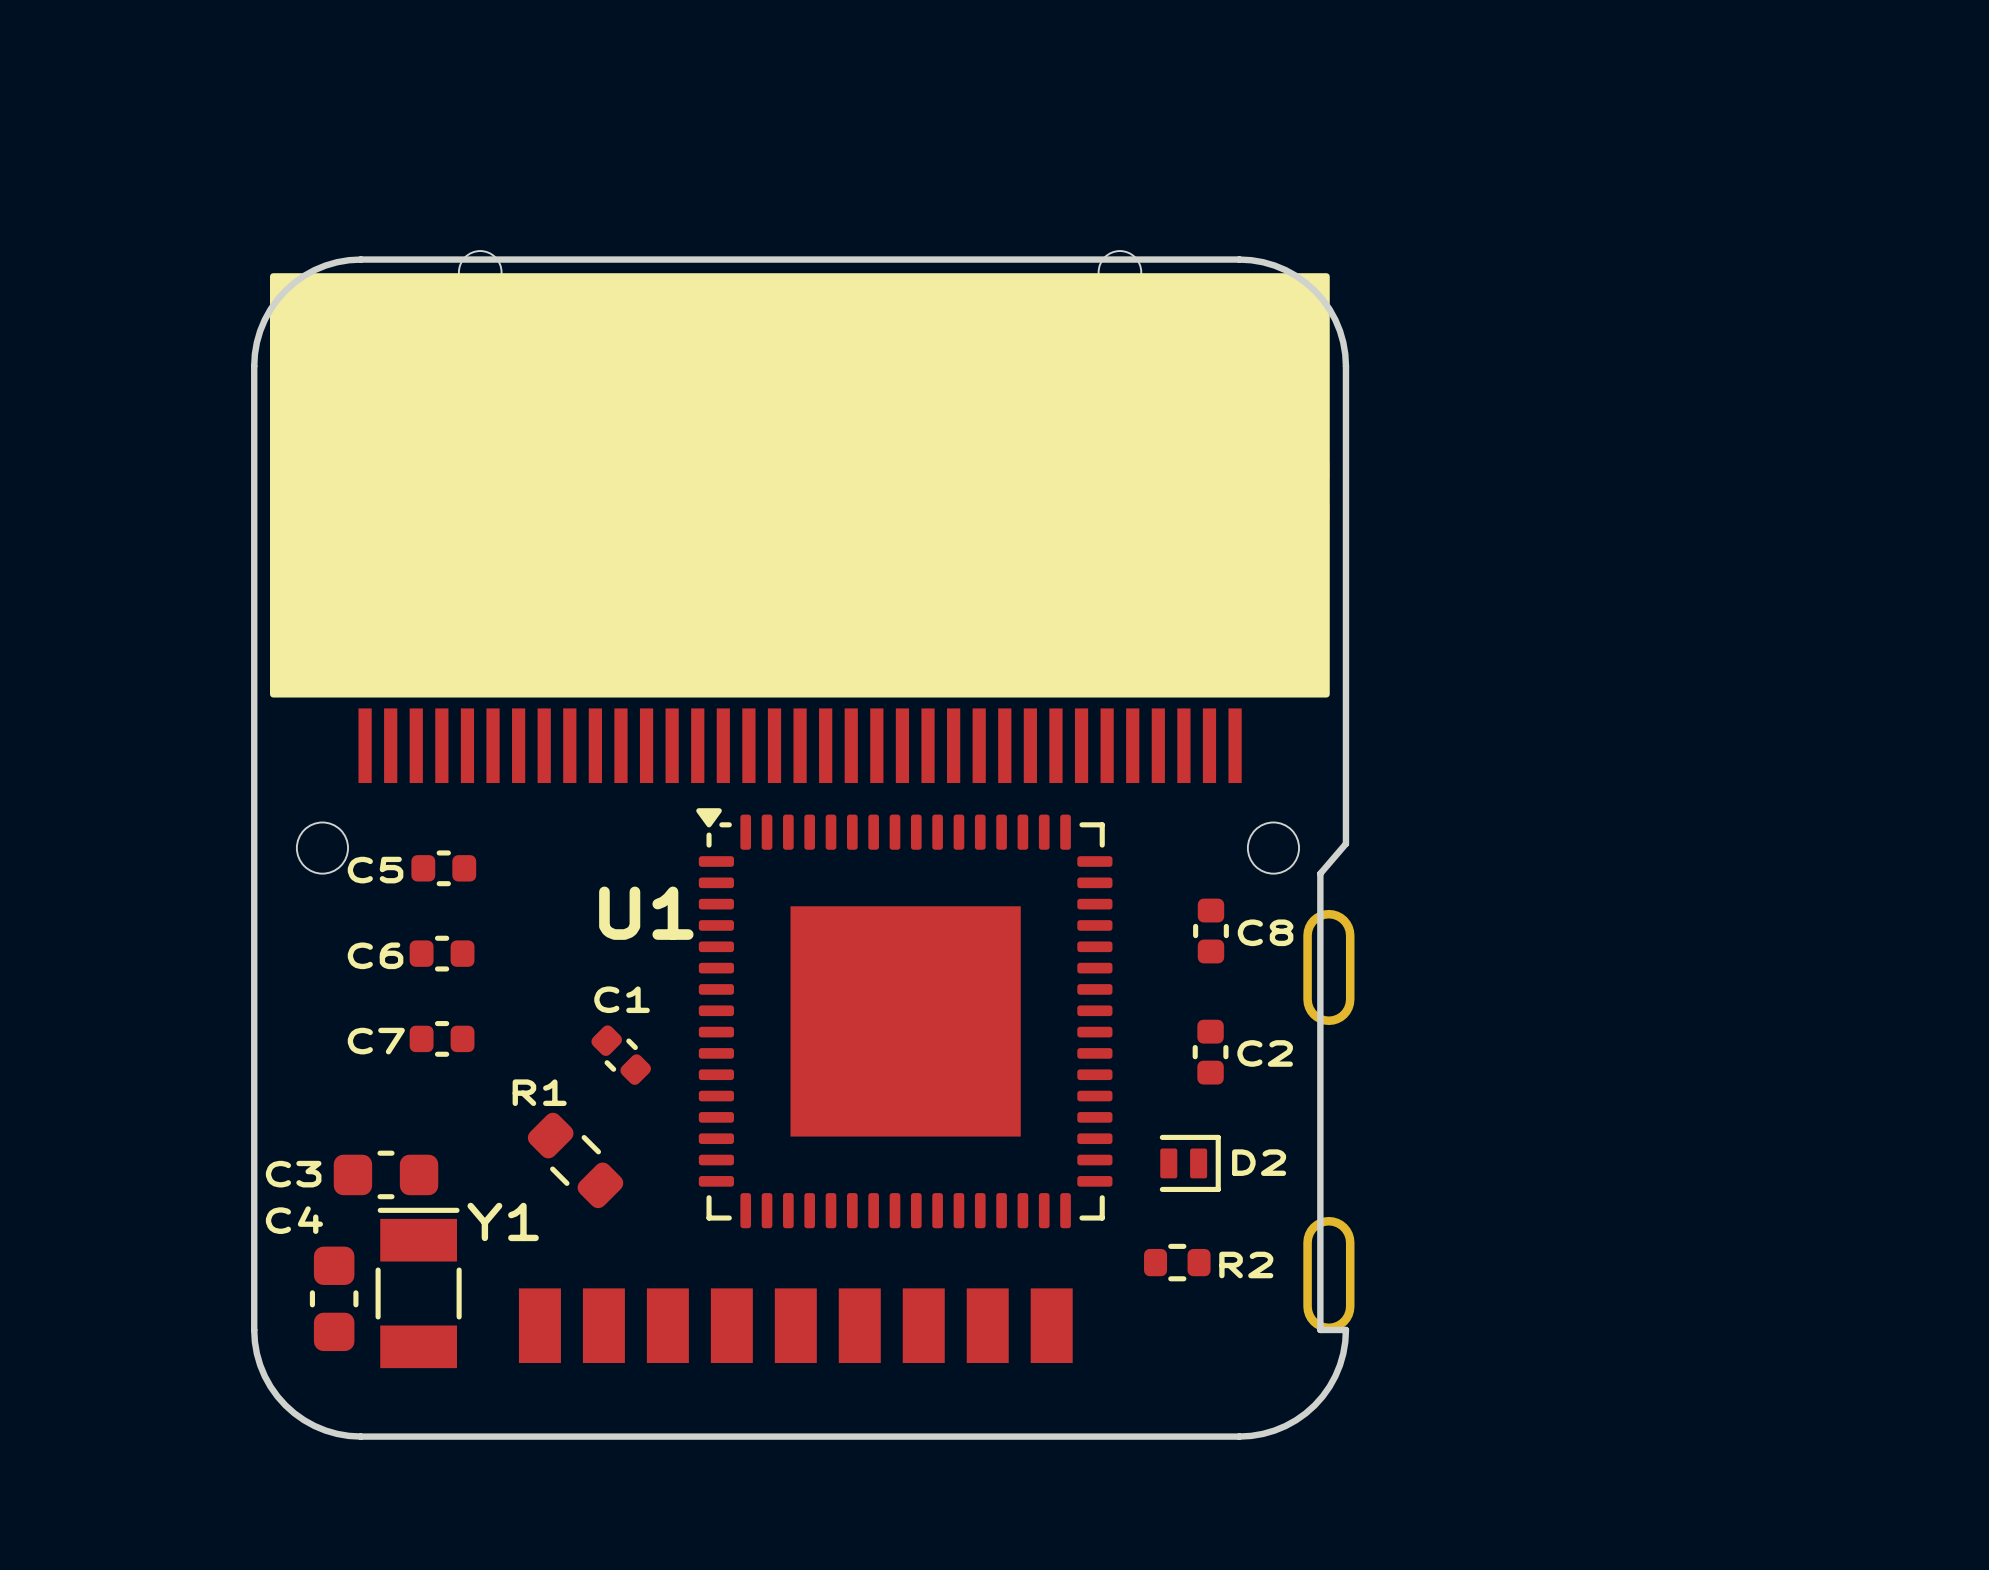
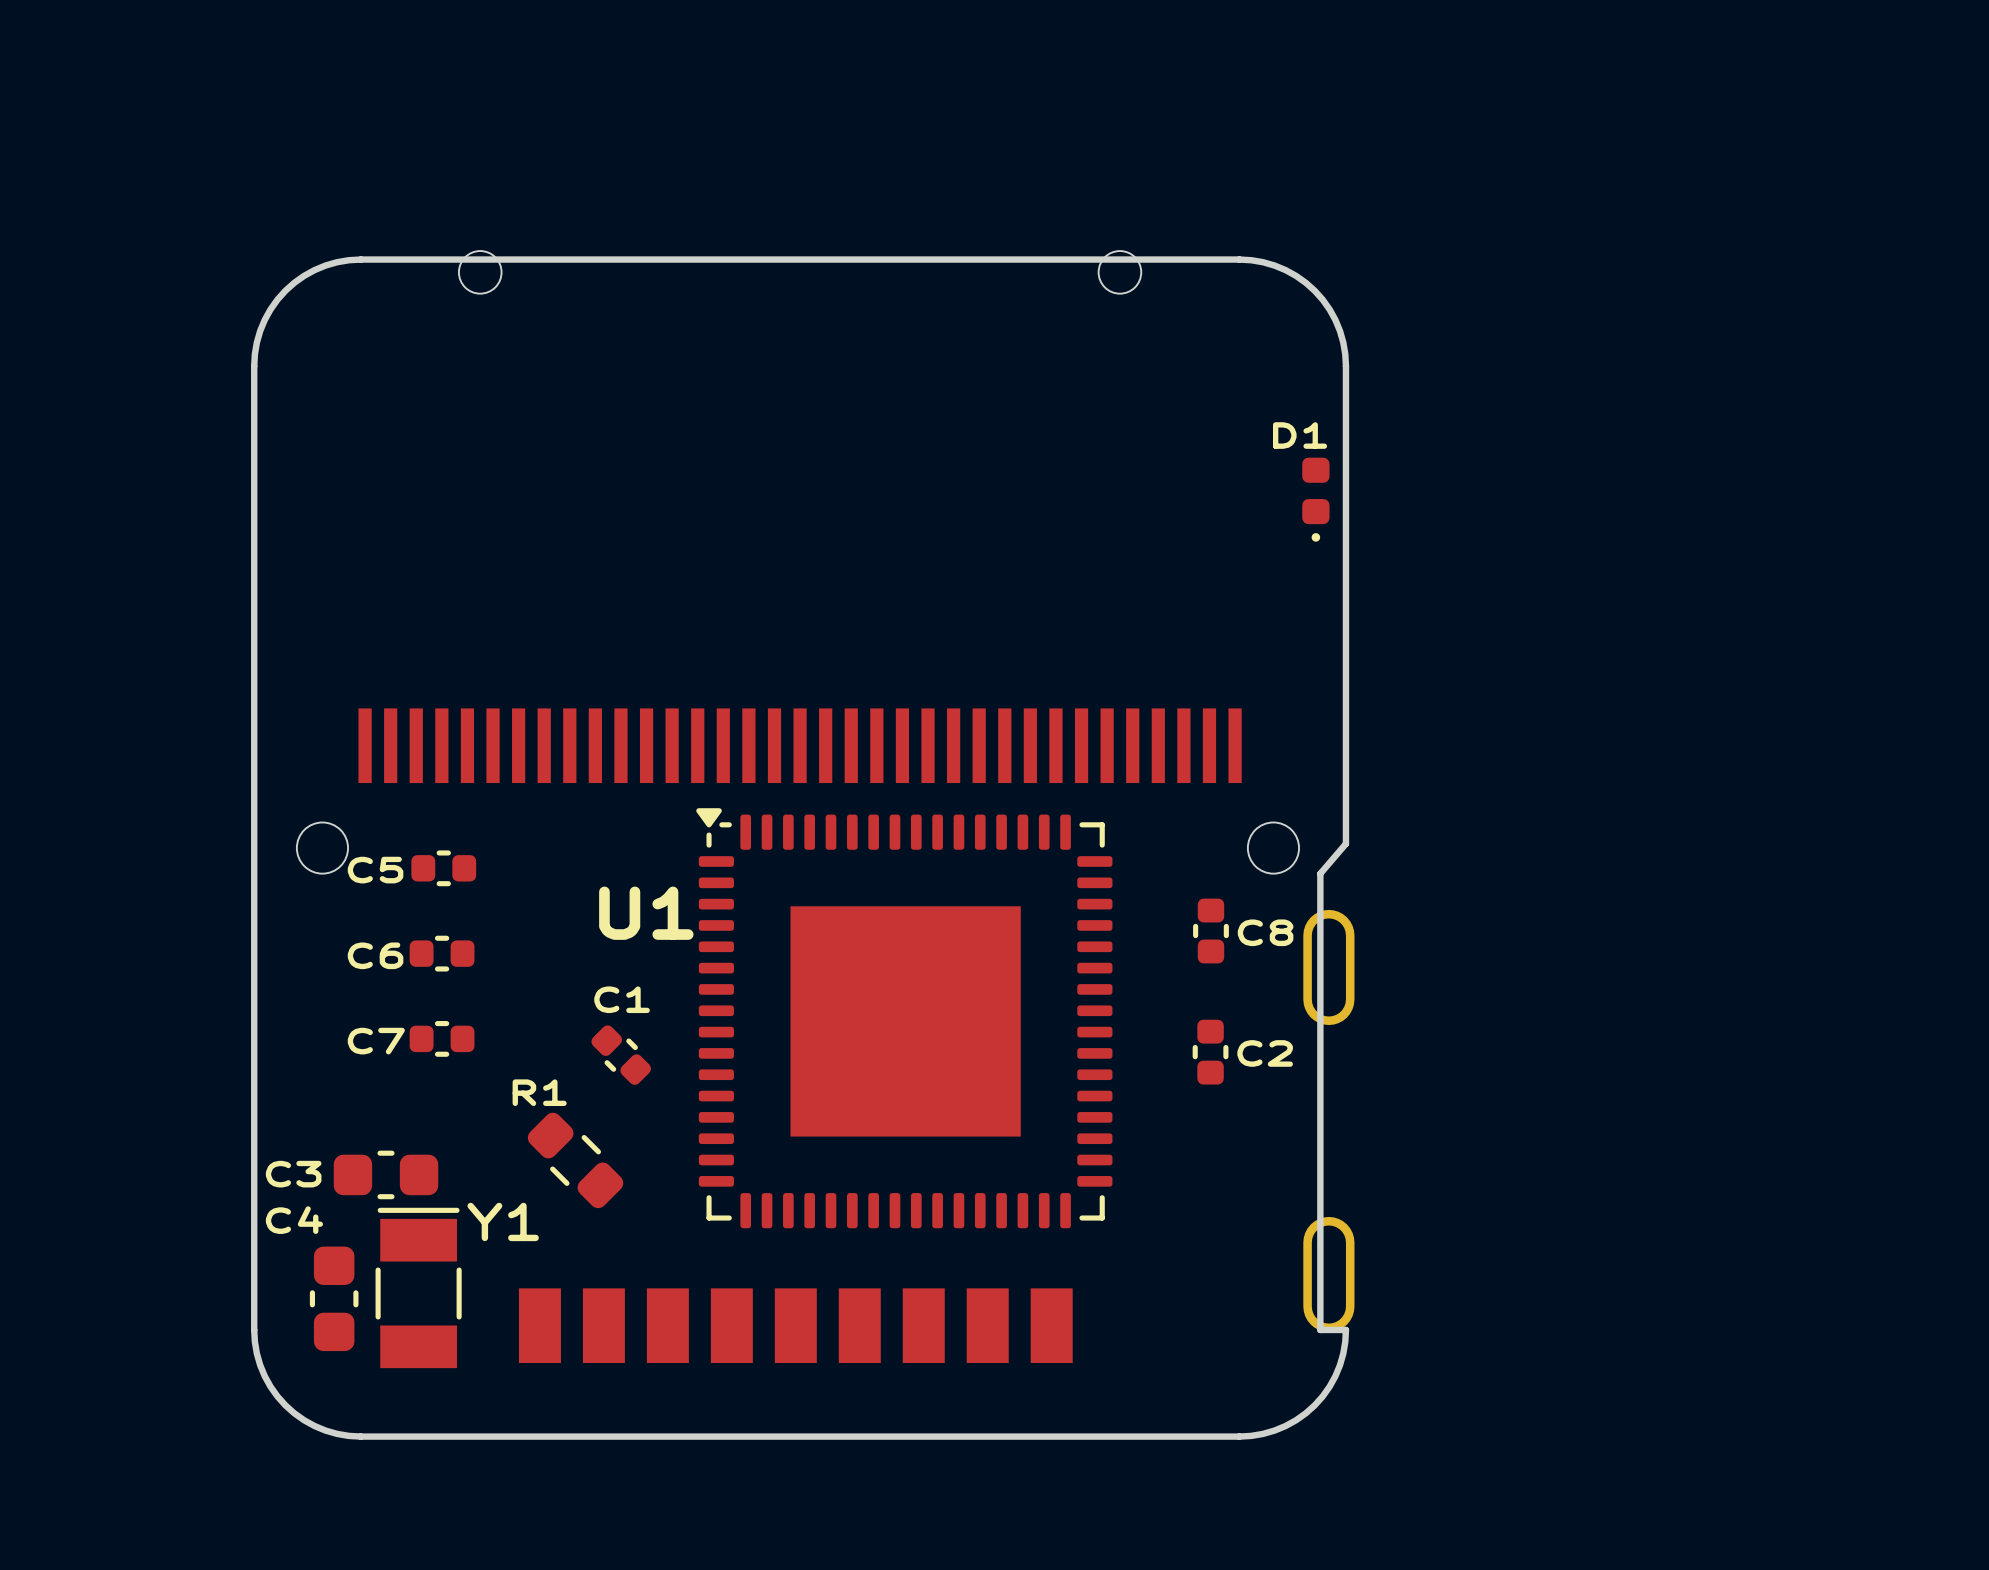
drawing: [269, 273, 1330, 698] -> none
D2: (1190, 1163) -> none
R2: (1177, 1262) -> none

